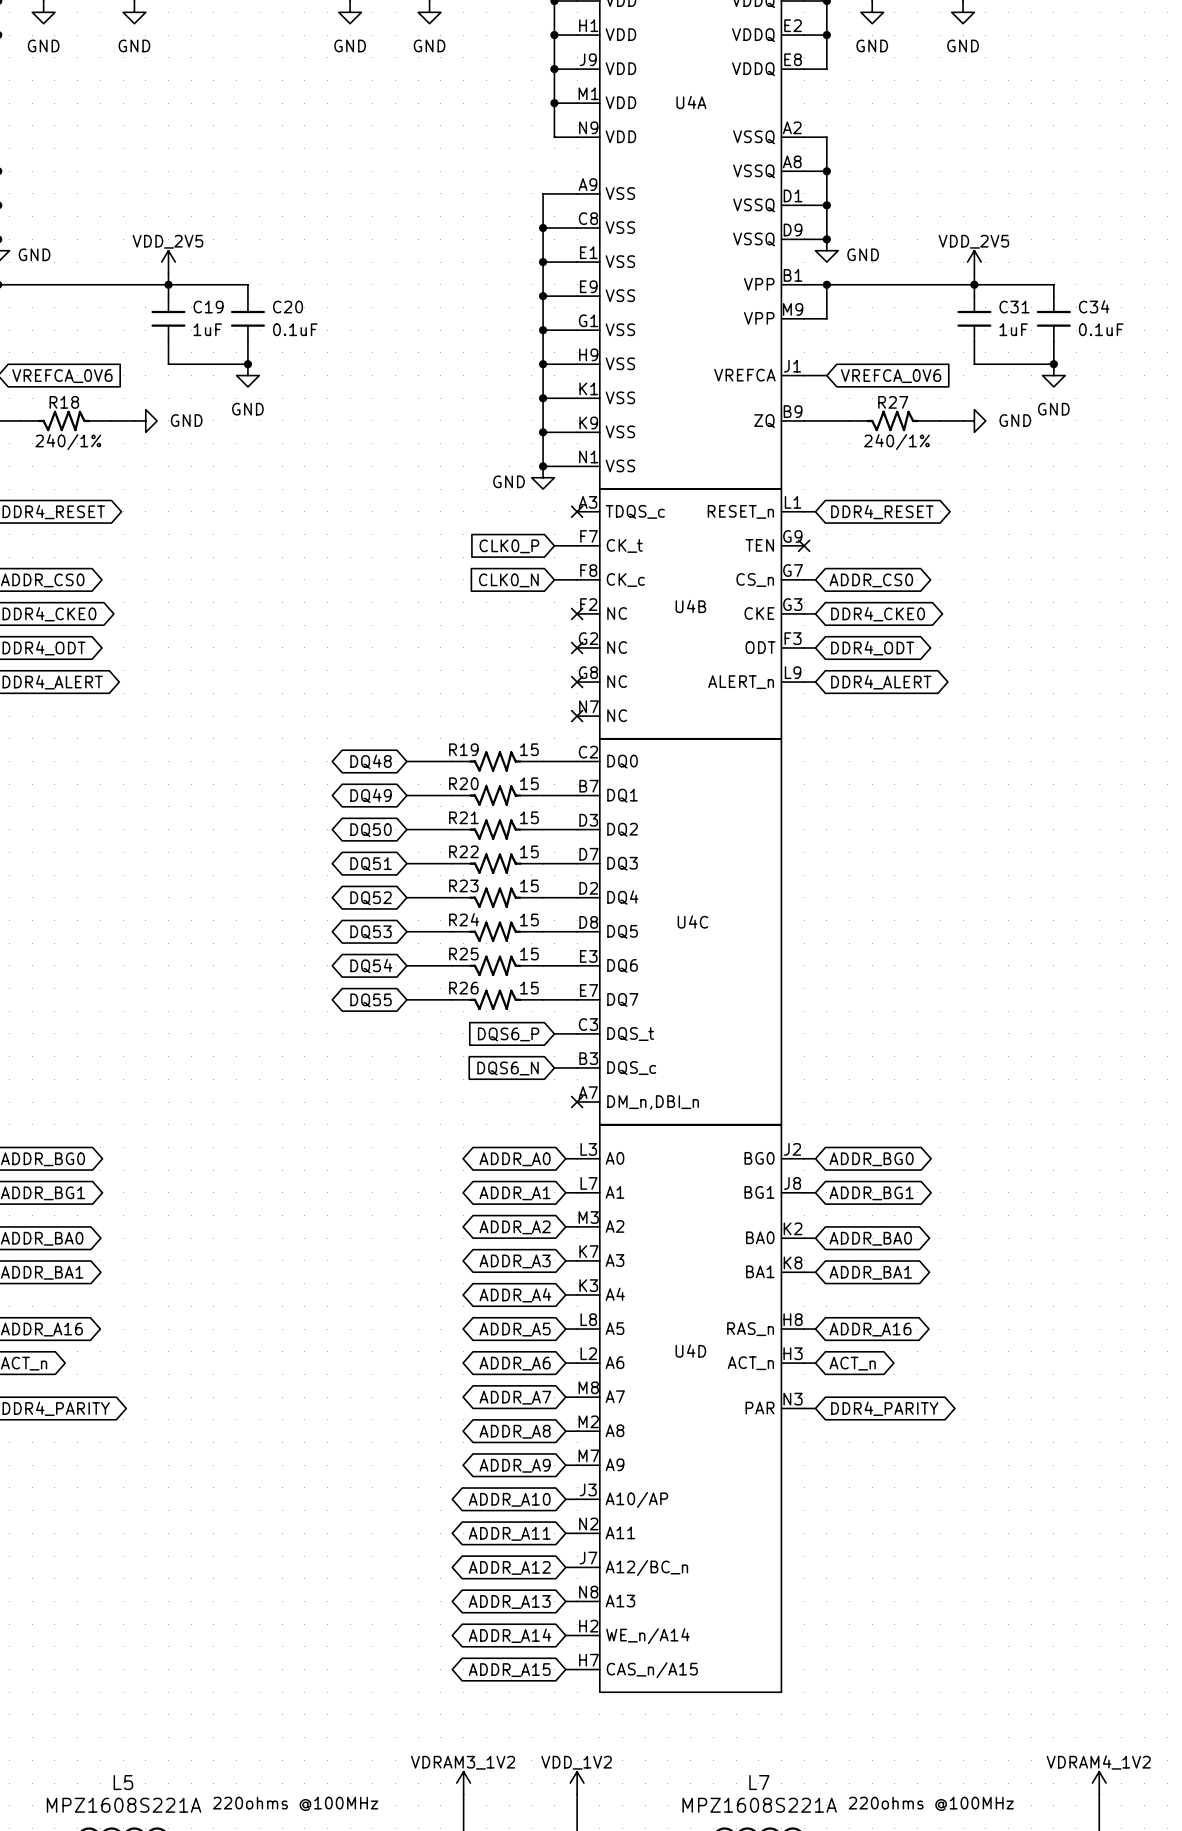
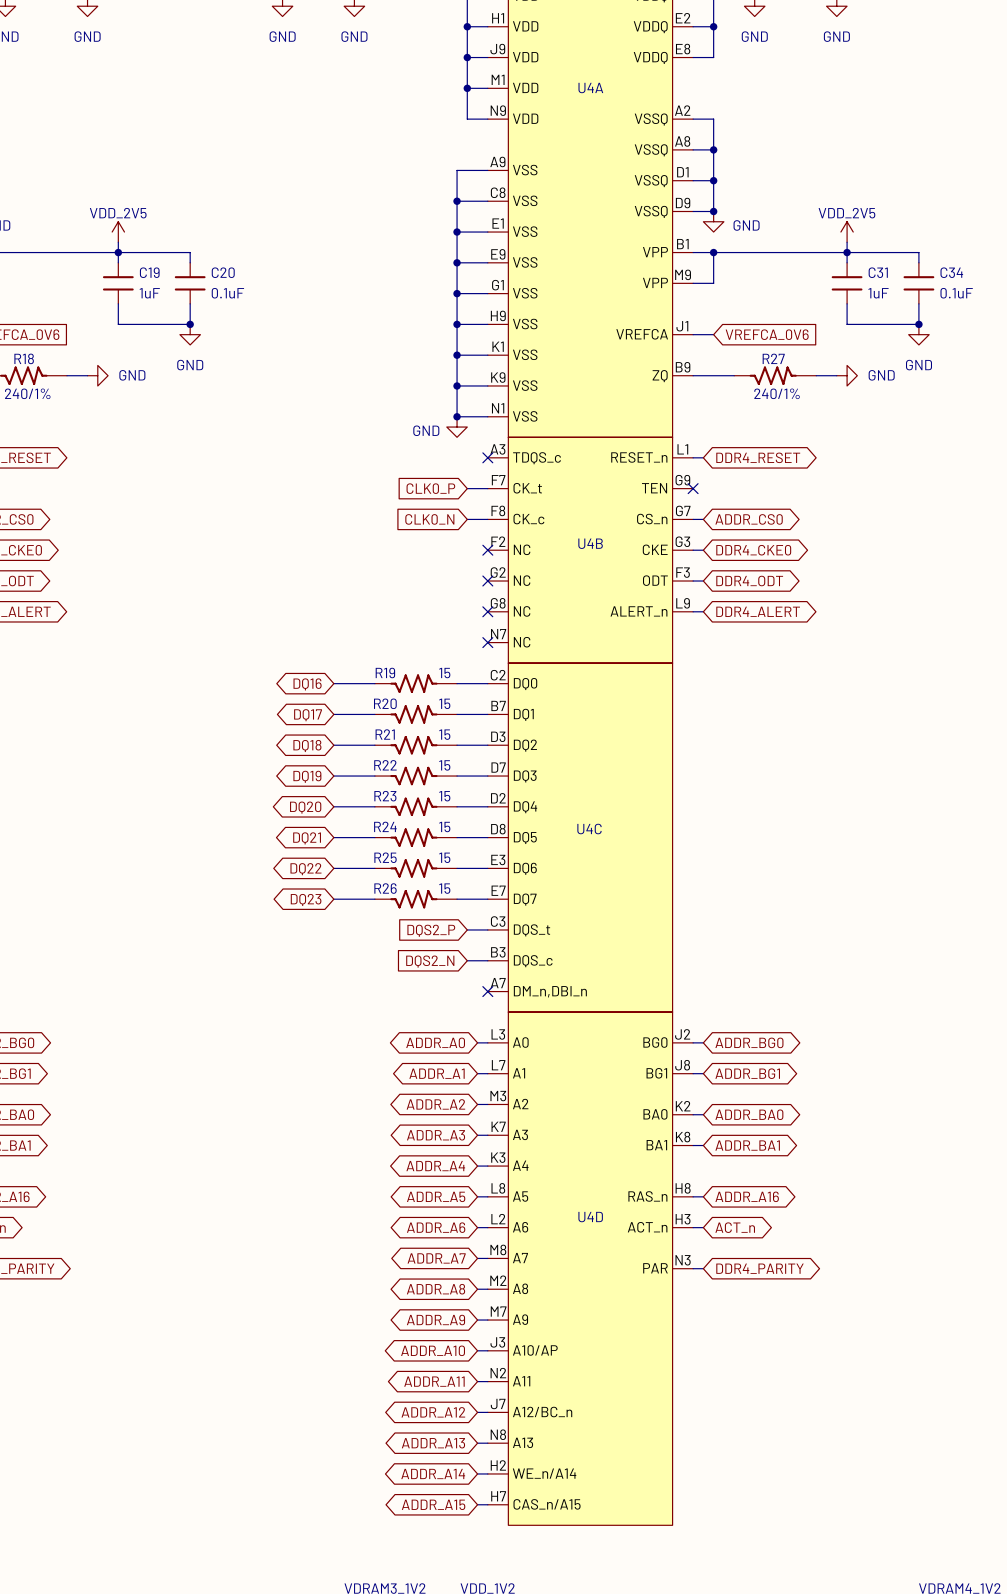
global label: DQ48 (371, 761) -> DQ16 (307, 684)
global label: DQ49 (371, 795) -> DQ17 (308, 715)
global label: DQ50 (371, 830) -> DQ18 (307, 746)
global label: DQ51 (371, 864) -> DQ19 (307, 776)
global label: DQ52 (371, 898) -> DQ20 (305, 807)
global label: DQ53 (371, 932) -> DQ21 (307, 838)
global label: DQ54 (371, 966) -> DQ22 (305, 869)
global label: DQ55 (371, 1000) -> DQ23 (306, 899)
global label: DQS6_P (508, 1034) -> DQS2_P (431, 930)
global label: DQS6_N (508, 1068) -> DQS2_N (430, 961)

